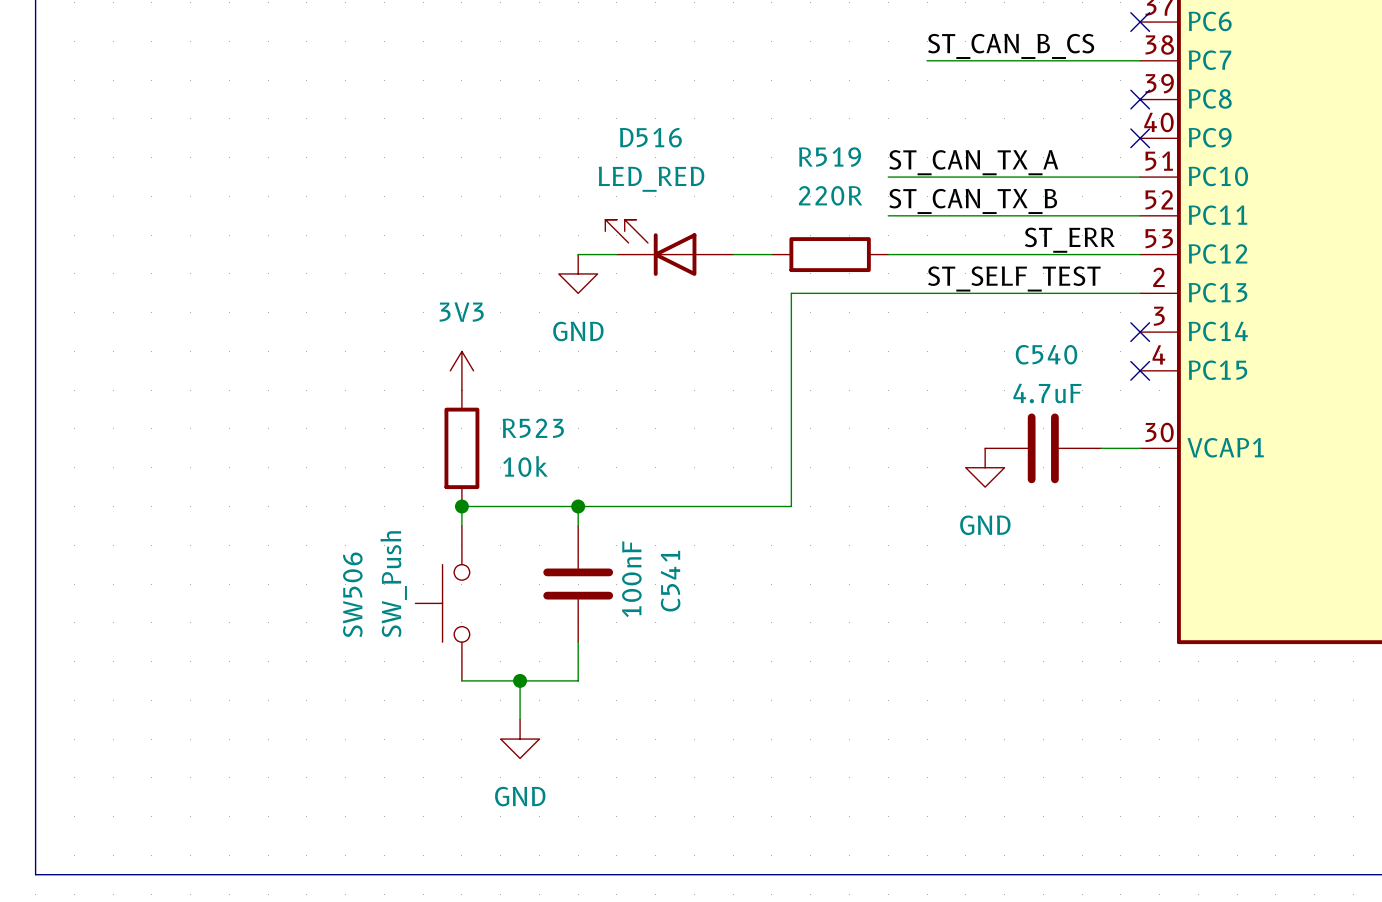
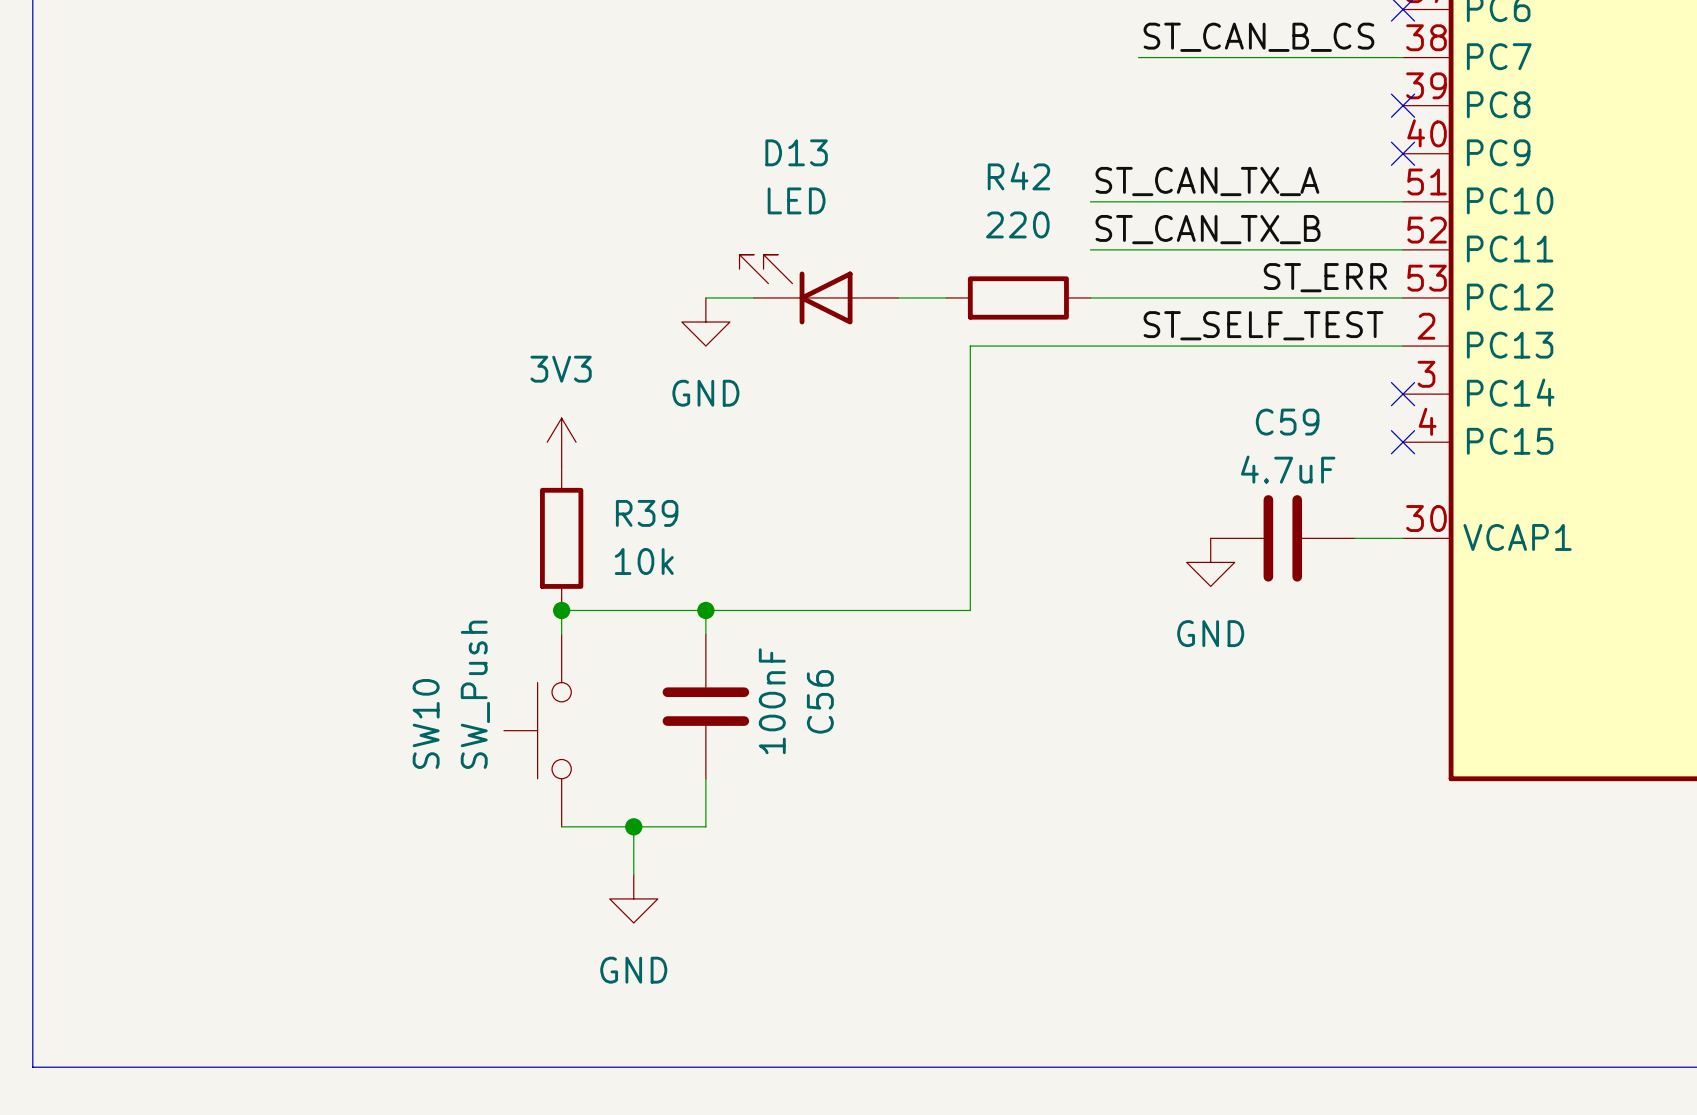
D516 name: D516 (650, 137) -> D13 (796, 152)
R519 name: R519 (829, 157) -> R42 (1018, 176)
D516 value: LED_RED (651, 179) -> LED (796, 200)
R519 value: 220R (830, 195) -> 220 (1017, 224)
C540 name: C540 (1046, 354) -> C59 (1287, 422)
R523 name: R523 (533, 428) -> R39 (647, 513)
C541 name: C541 (670, 581) -> C56 (820, 701)
SW506 name: SW506 (352, 594) -> SW10 (426, 723)

